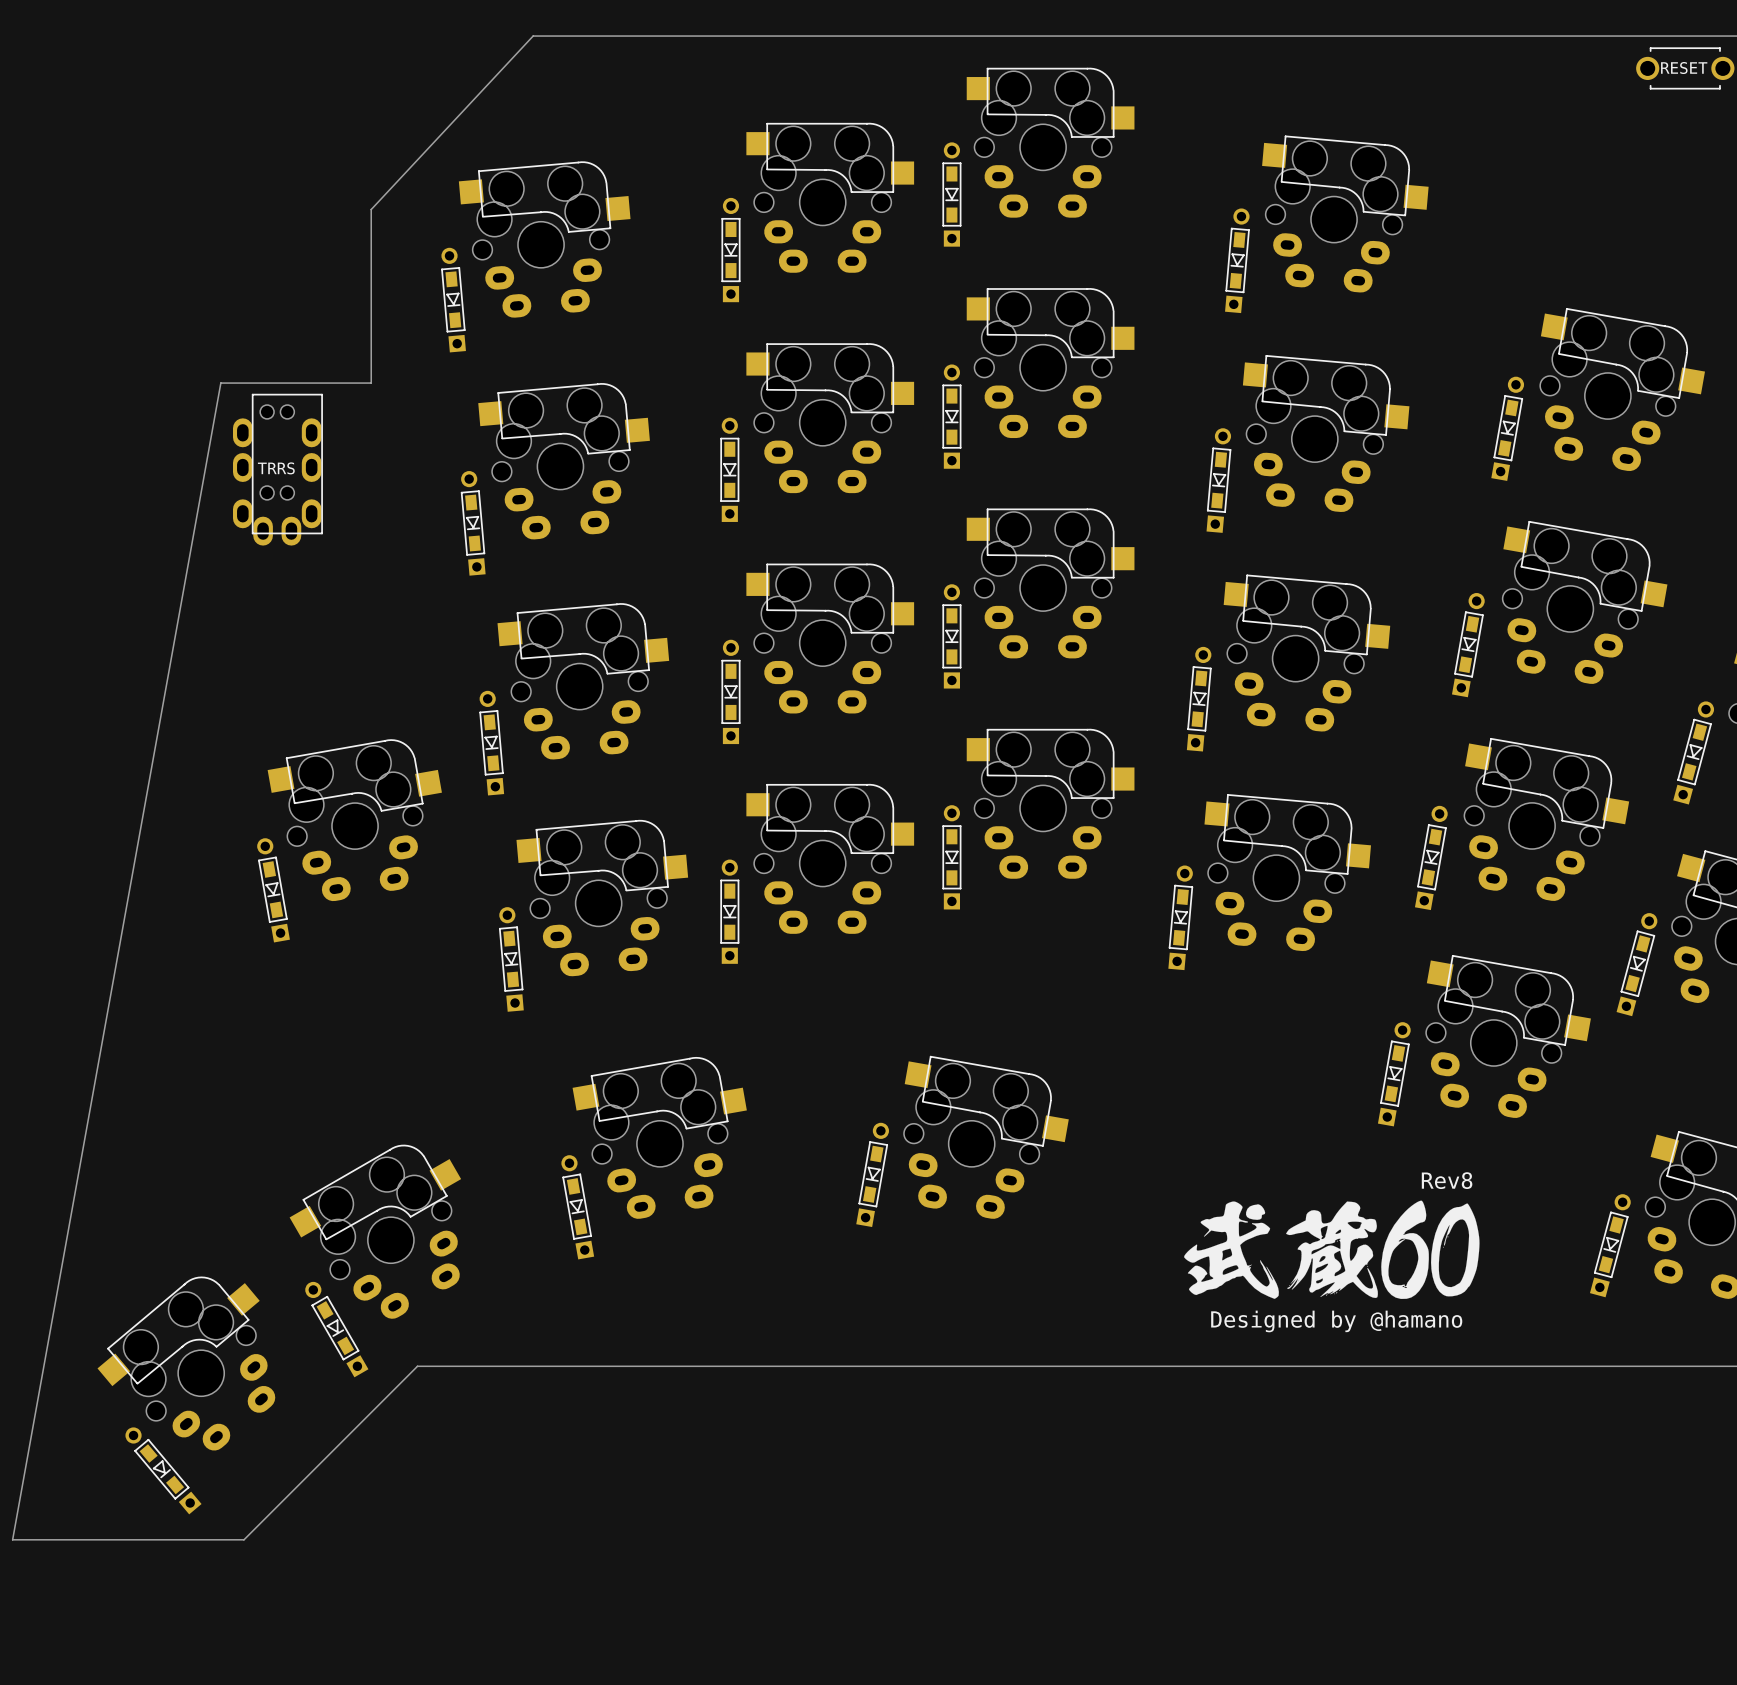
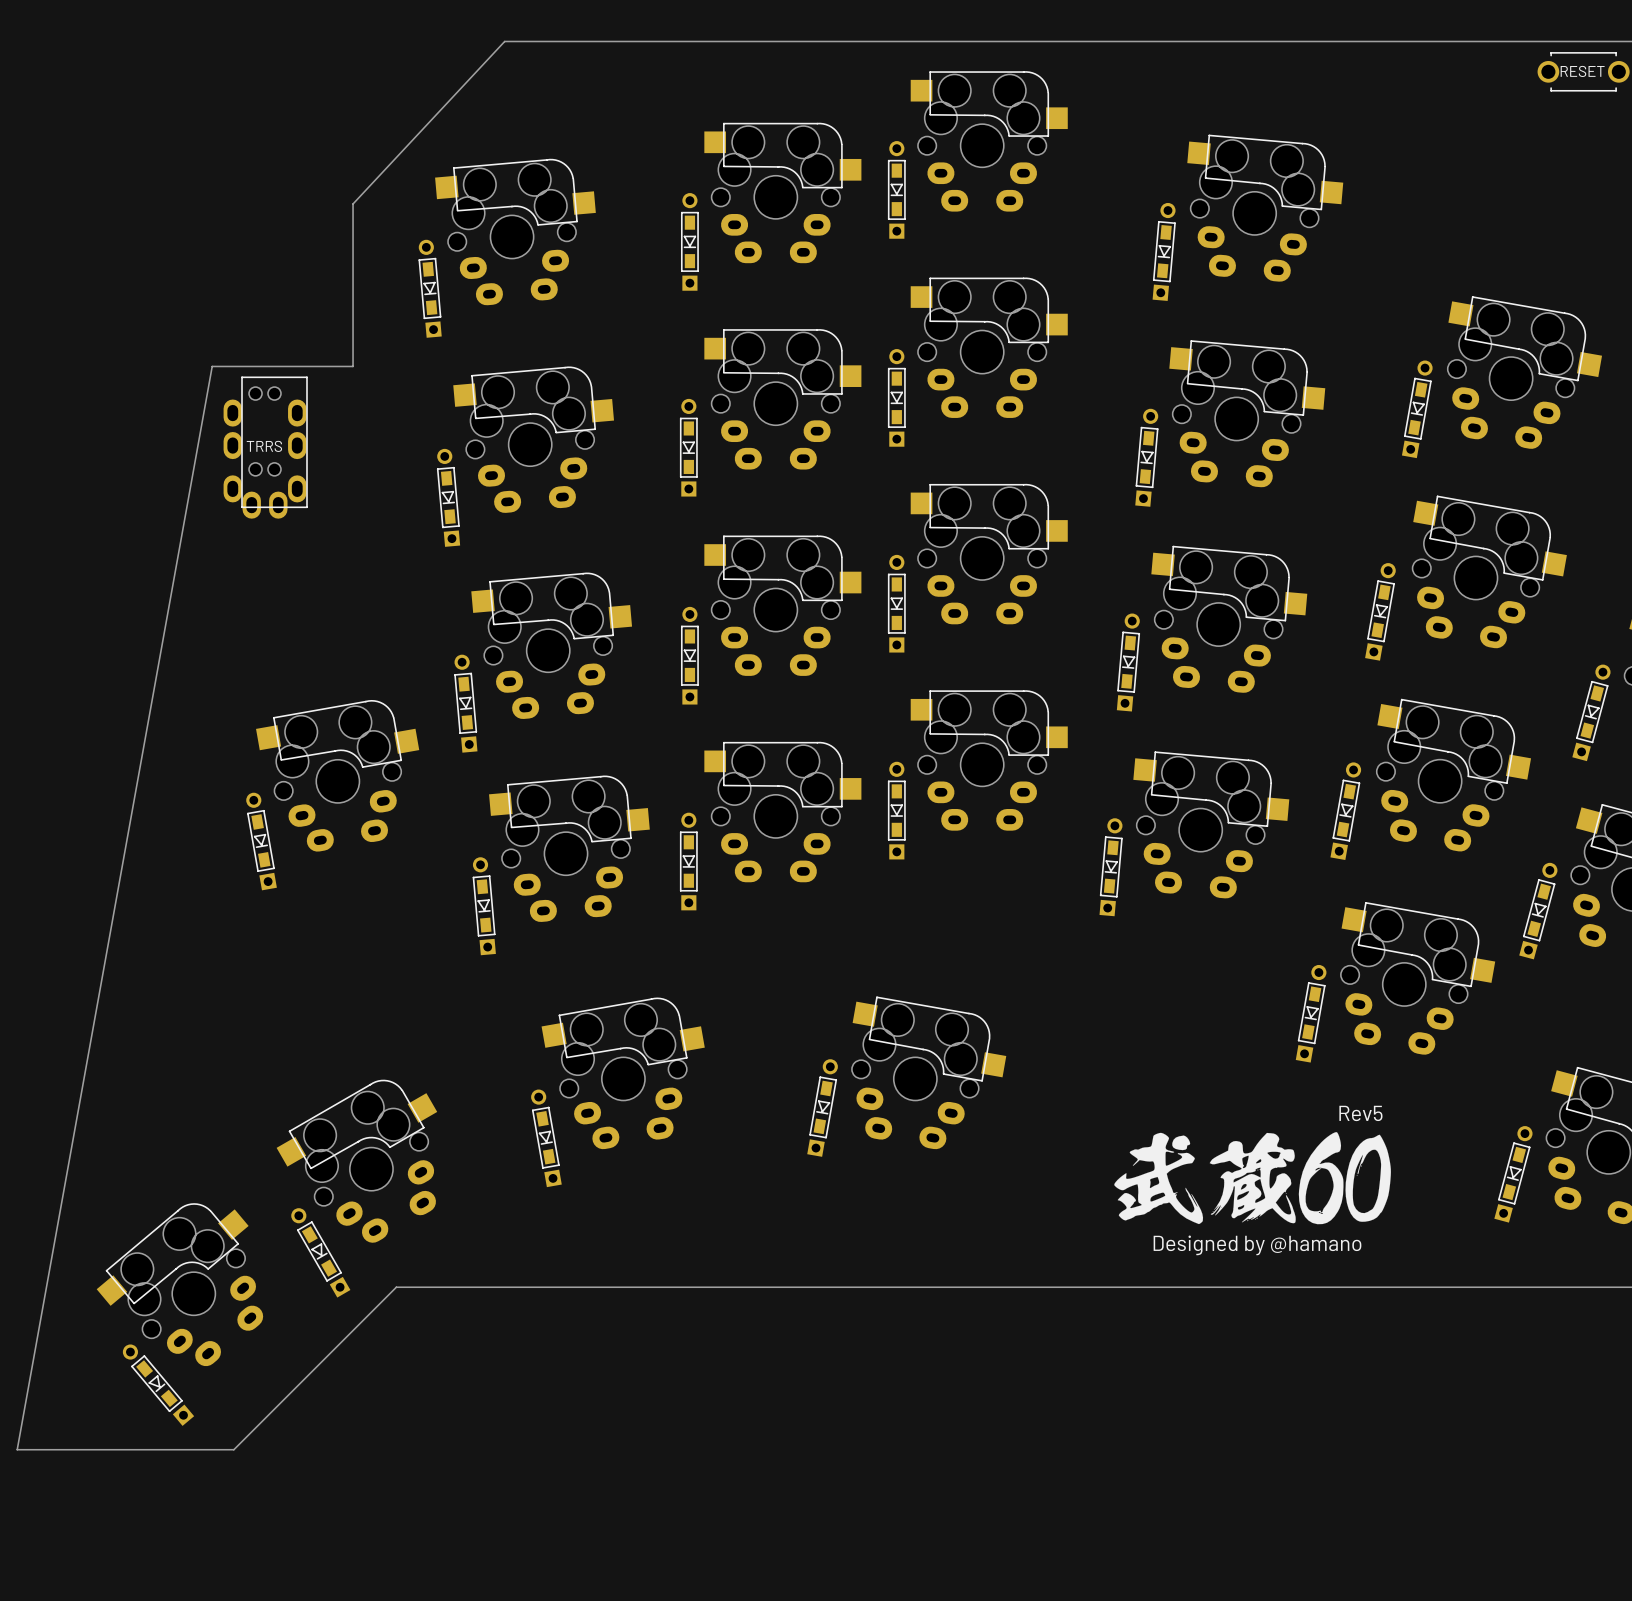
text: Rev8 (1447, 1180) -> Rev5 (1360, 1113)

